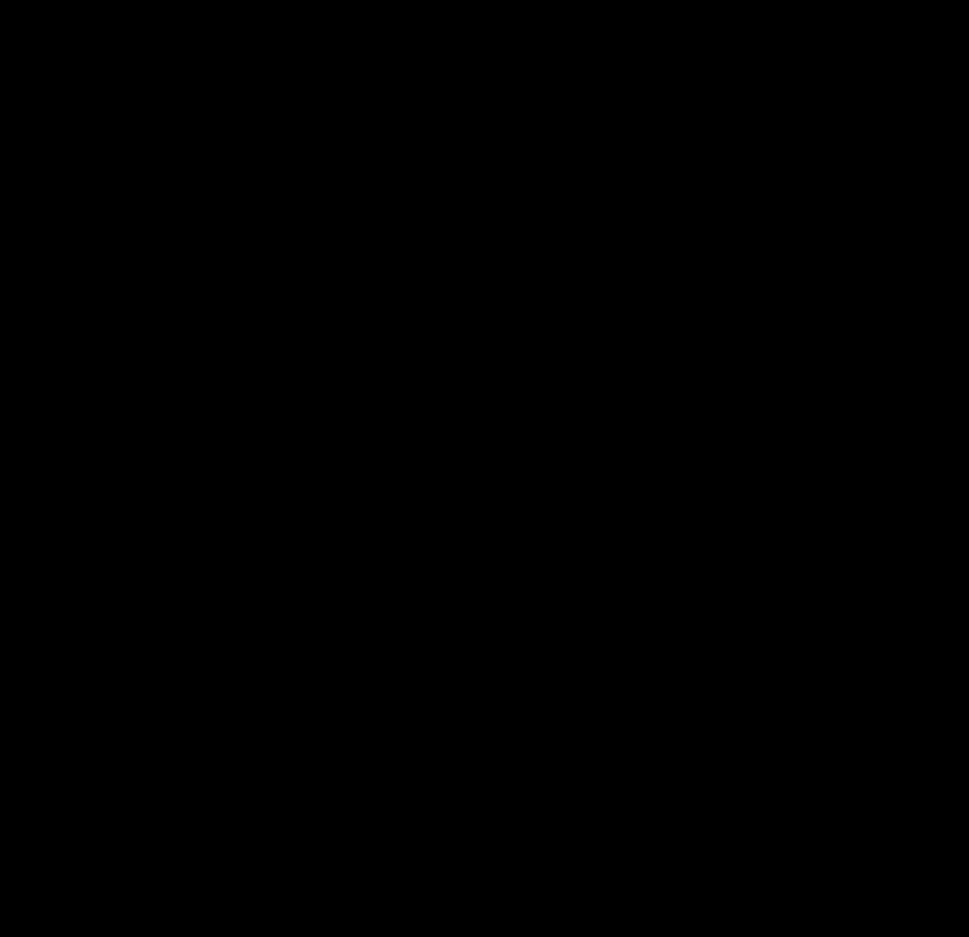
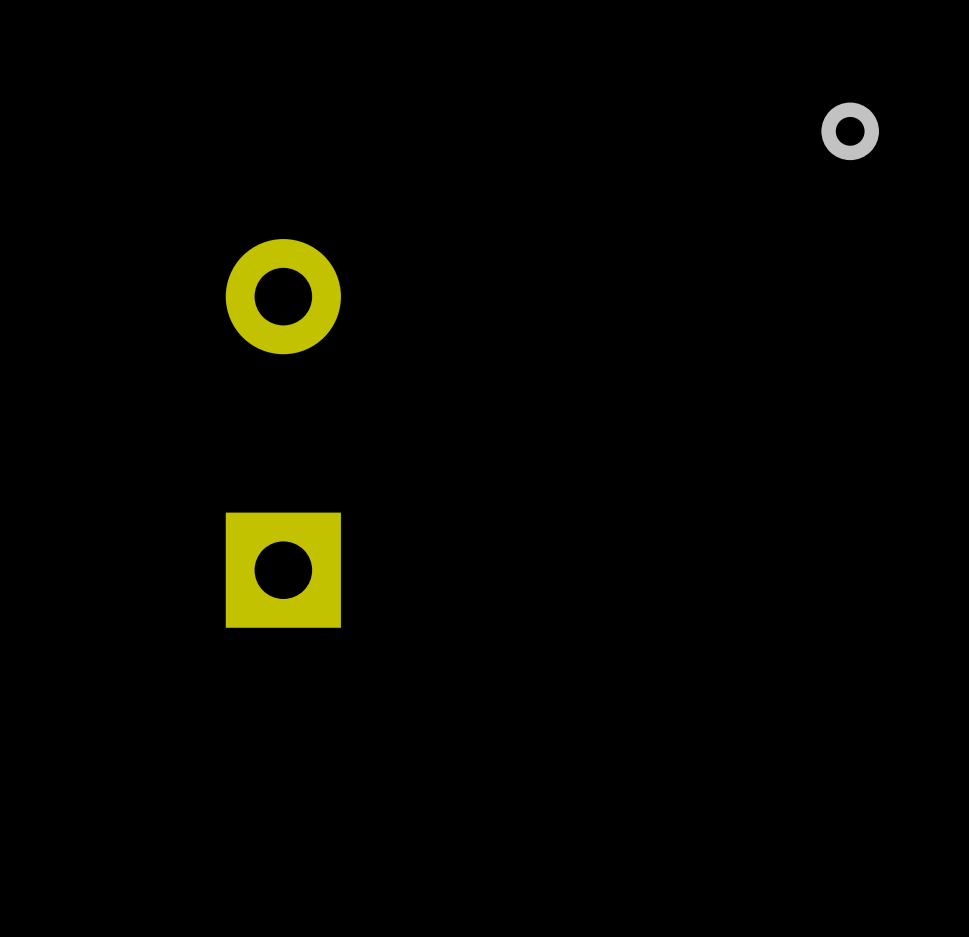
via: none -> (850, 131)
part: none -> (283, 433)

